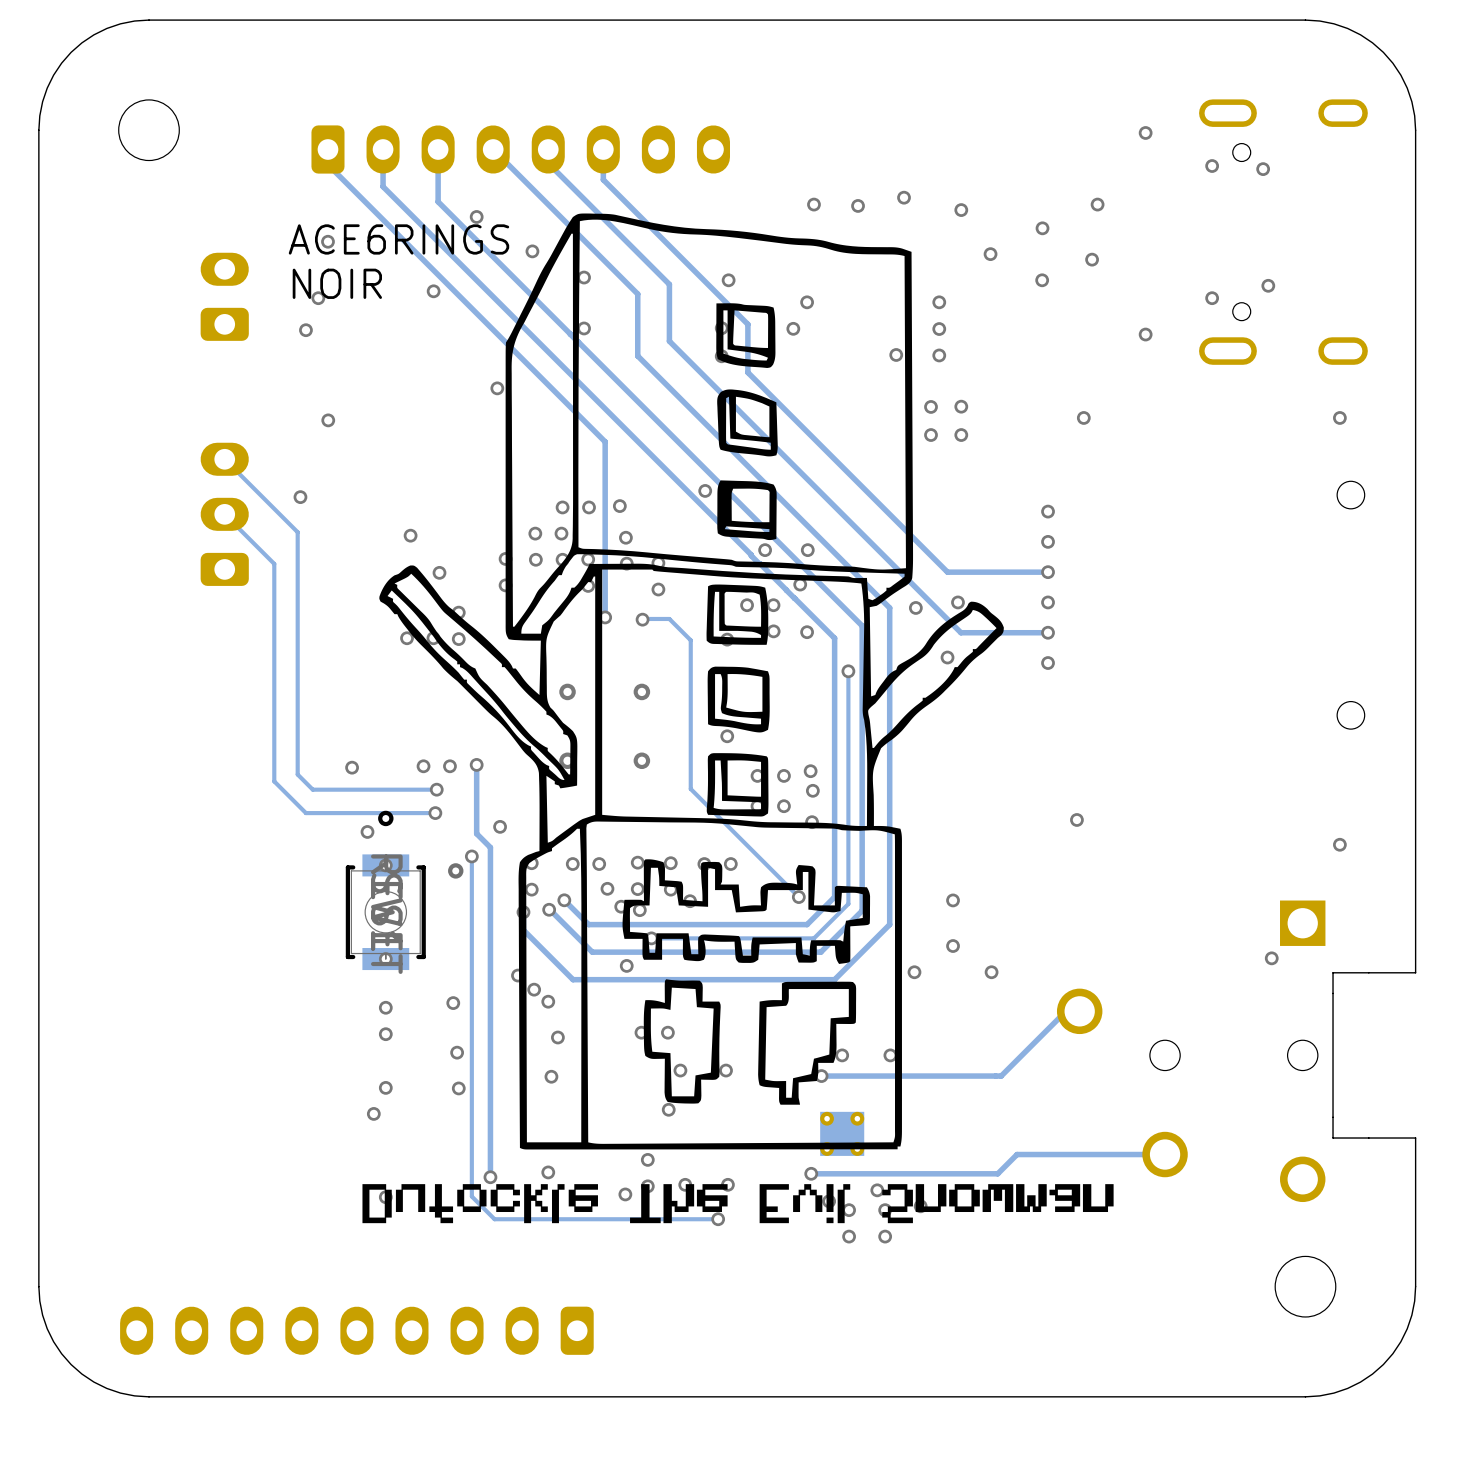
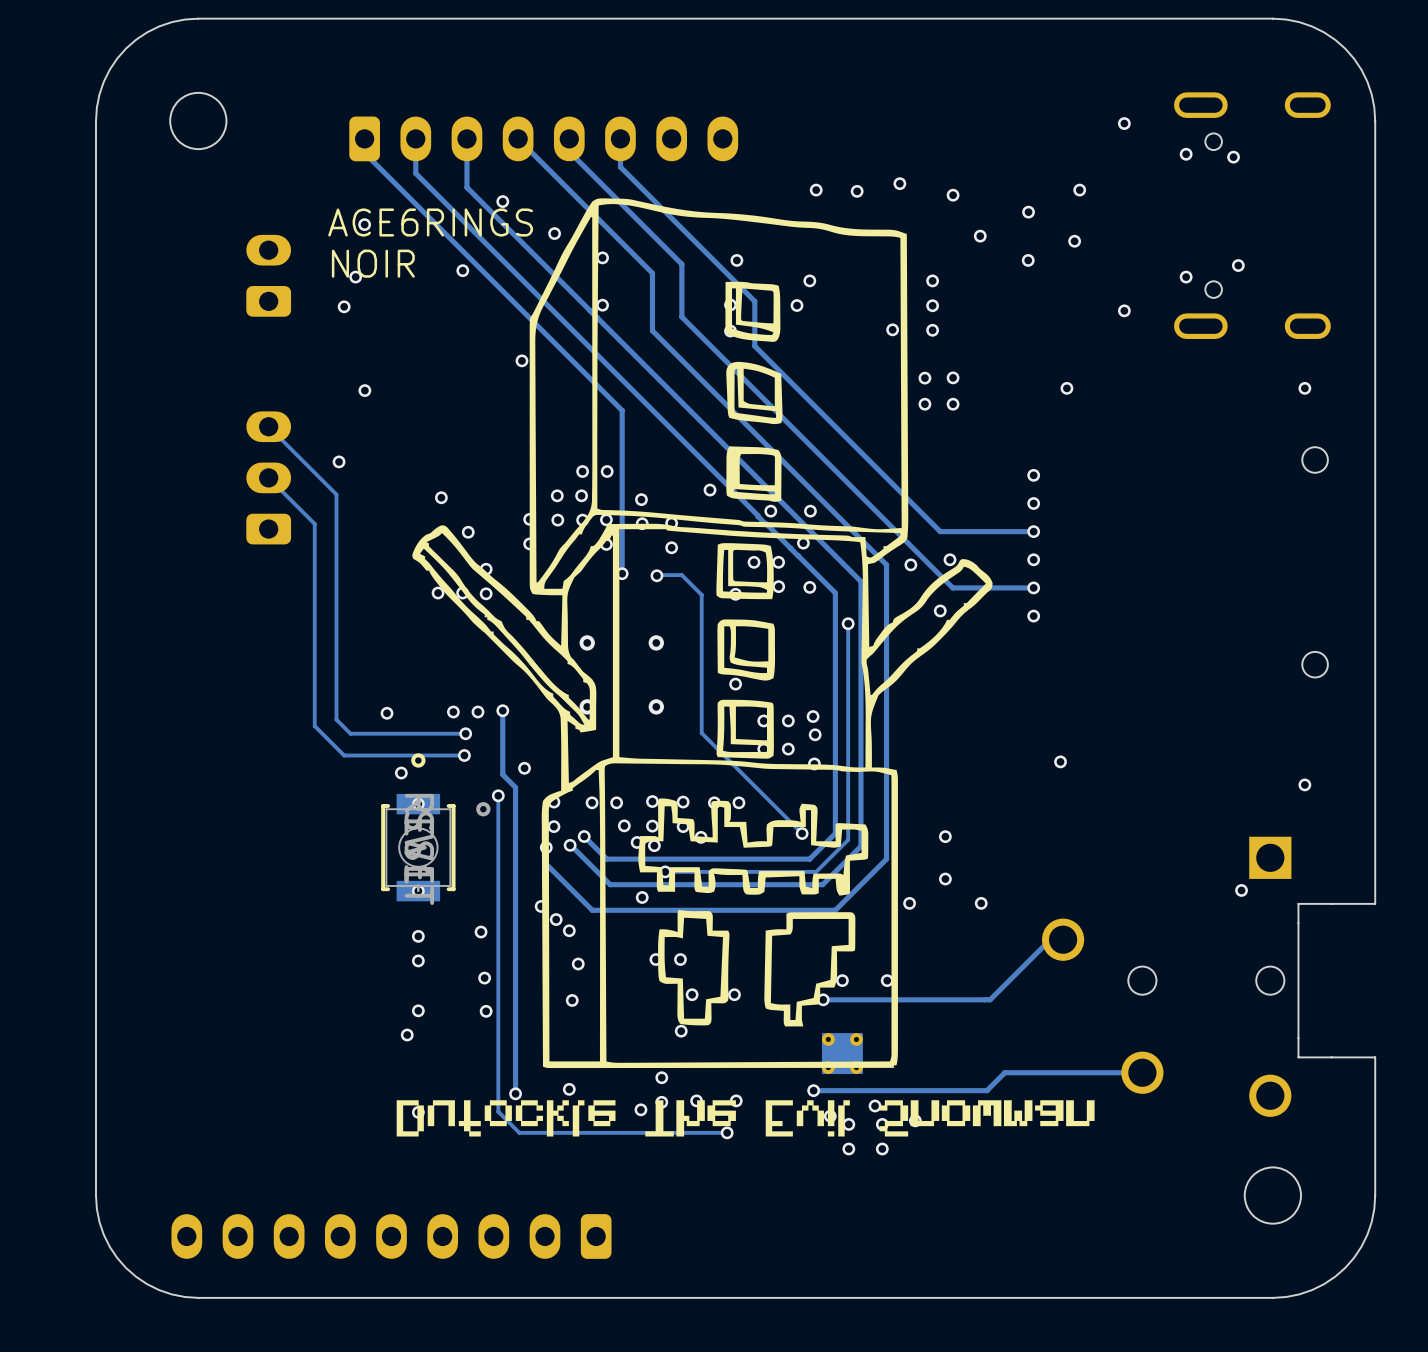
via position: (705, 490) -> (710, 490)
via: (619, 506) -> none

